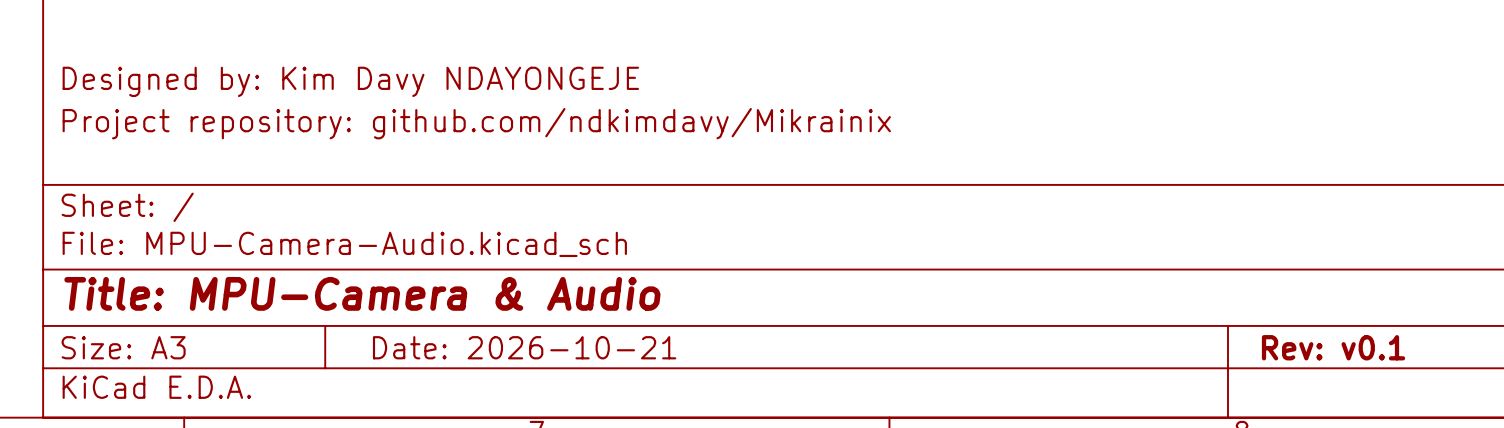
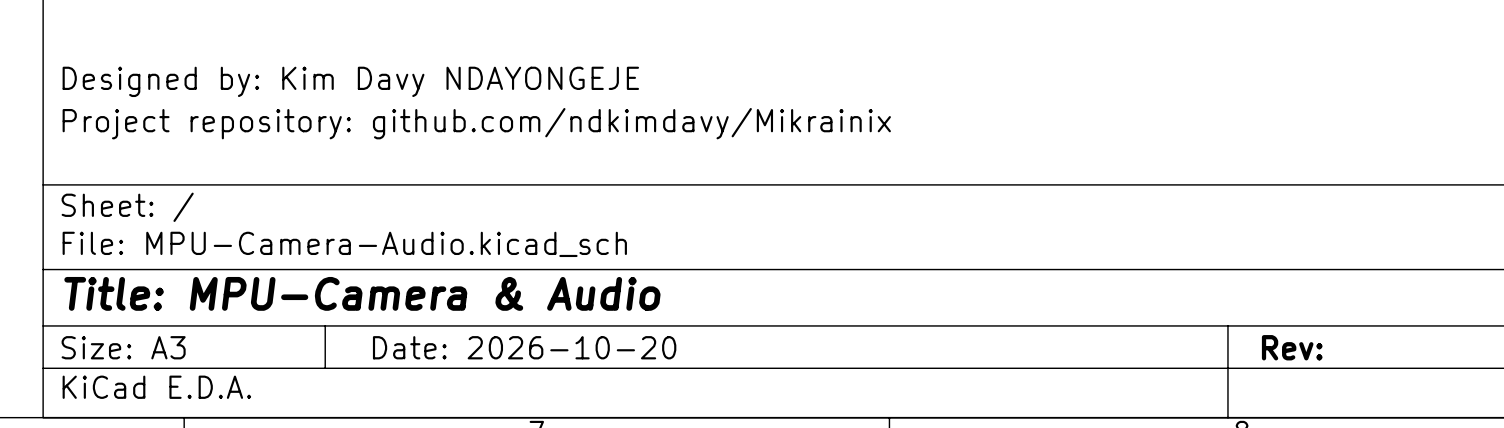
title block: Date: 2026-10-21 (524, 347) -> Date: 2026-10-20 (524, 347)
title block: Rev: v0.1 (1333, 347) -> Rev: (1292, 347)

